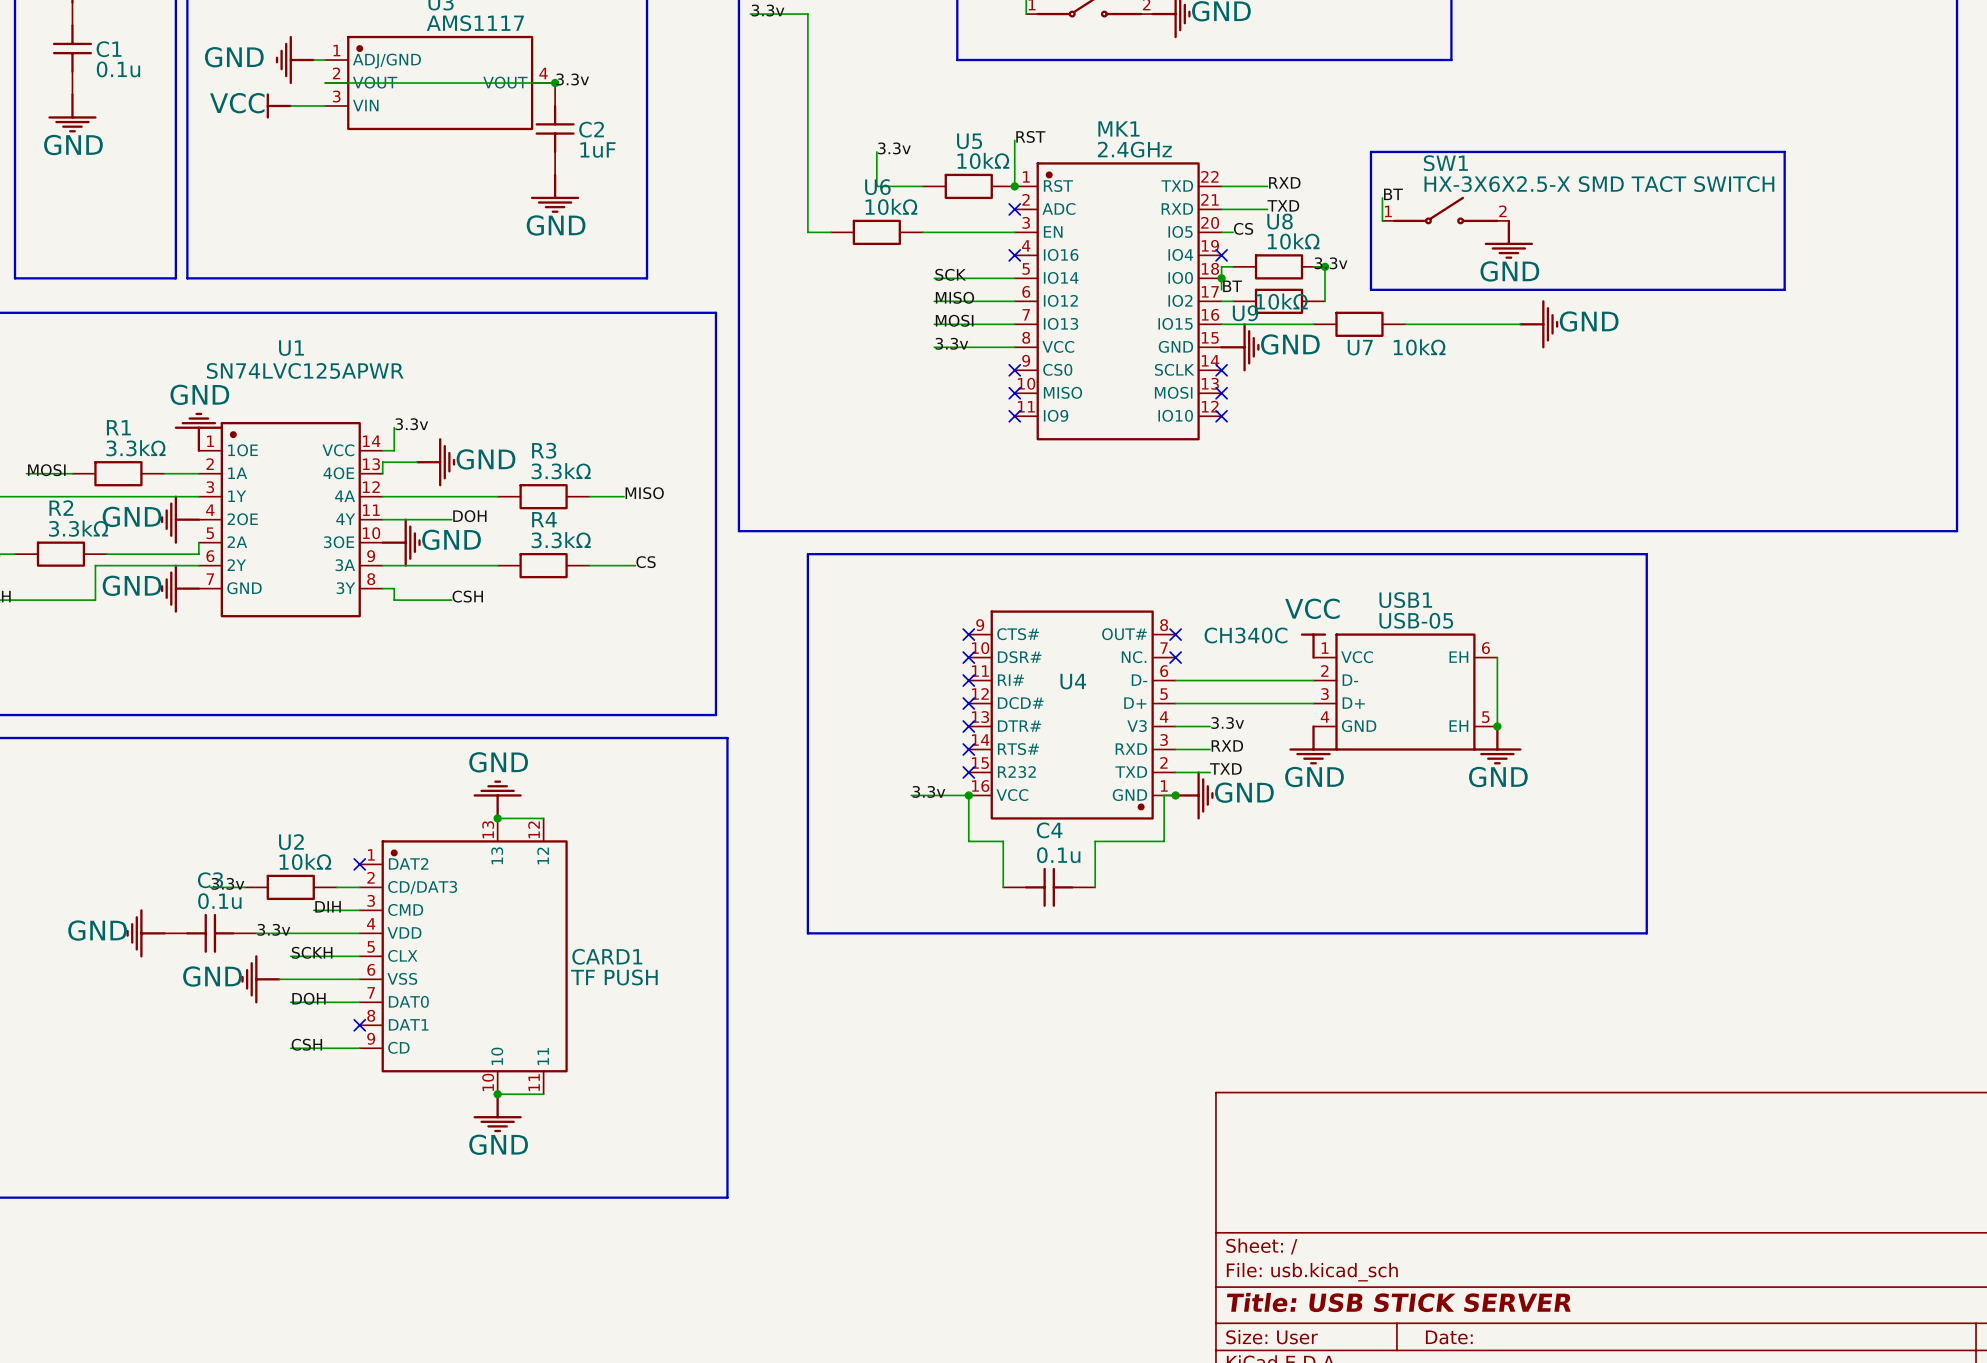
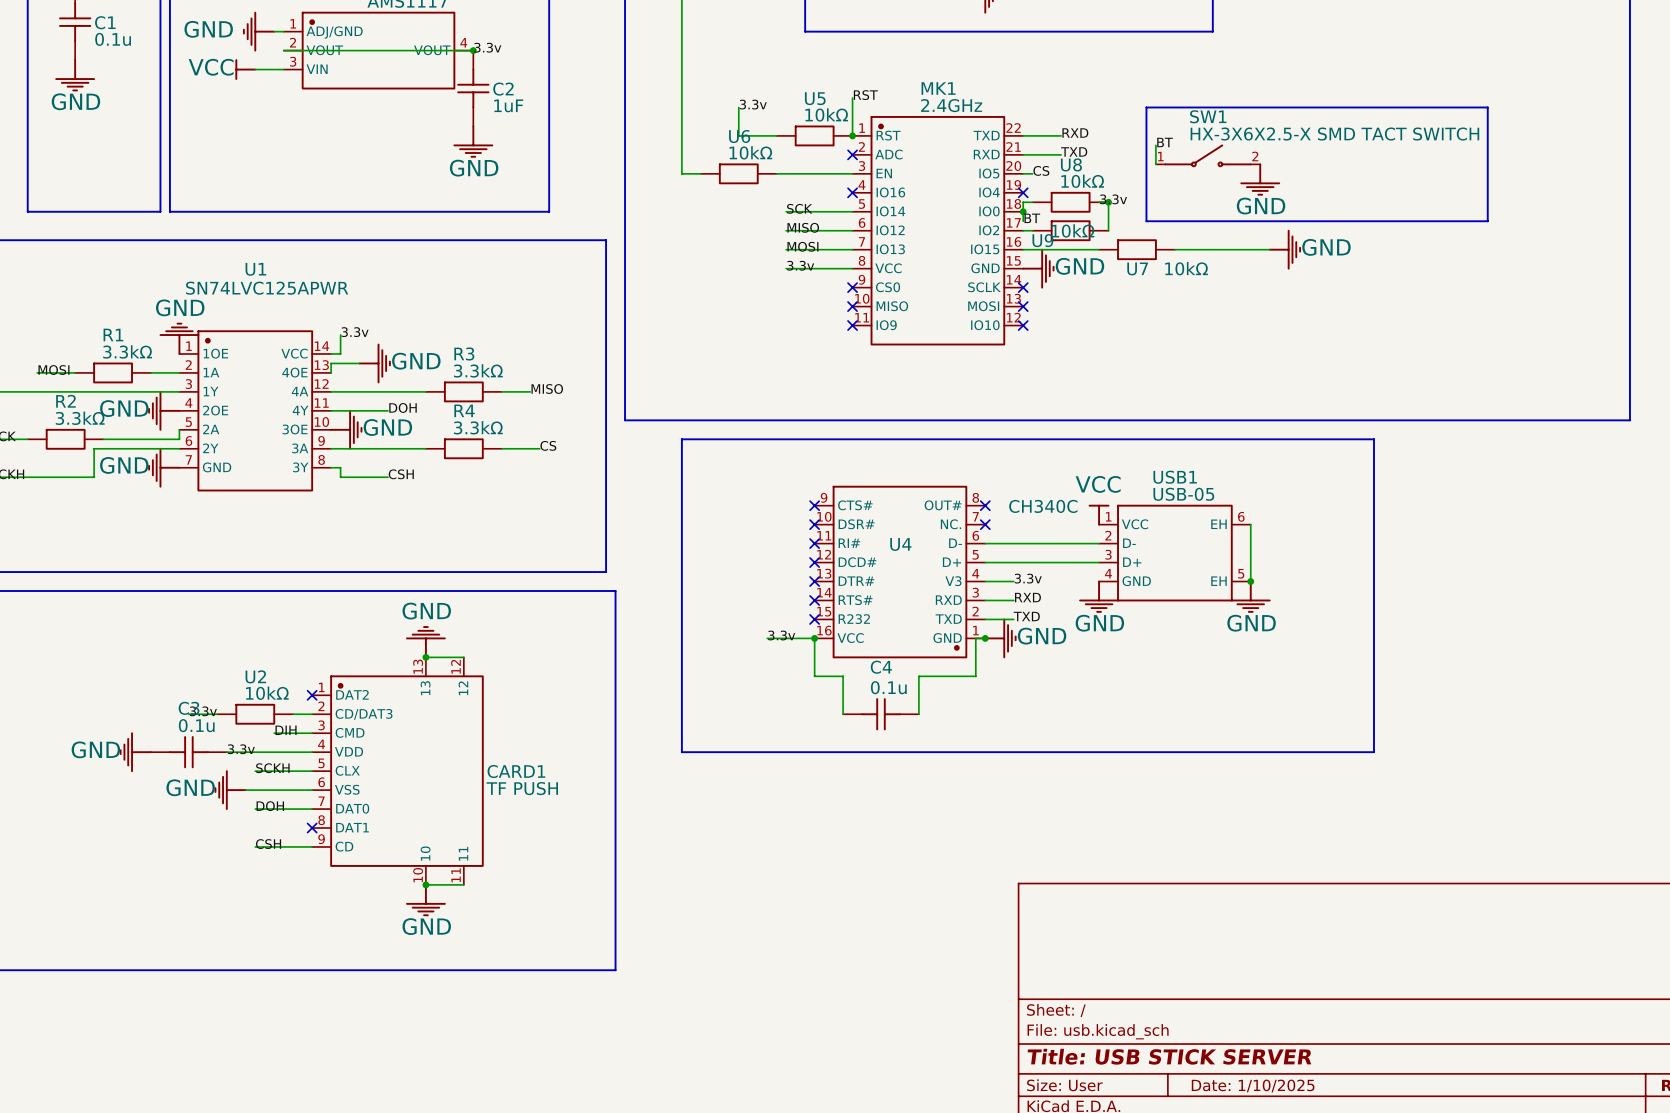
title block: Date: (1449, 1337) -> Date: 1/10/2025 (1253, 1086)

